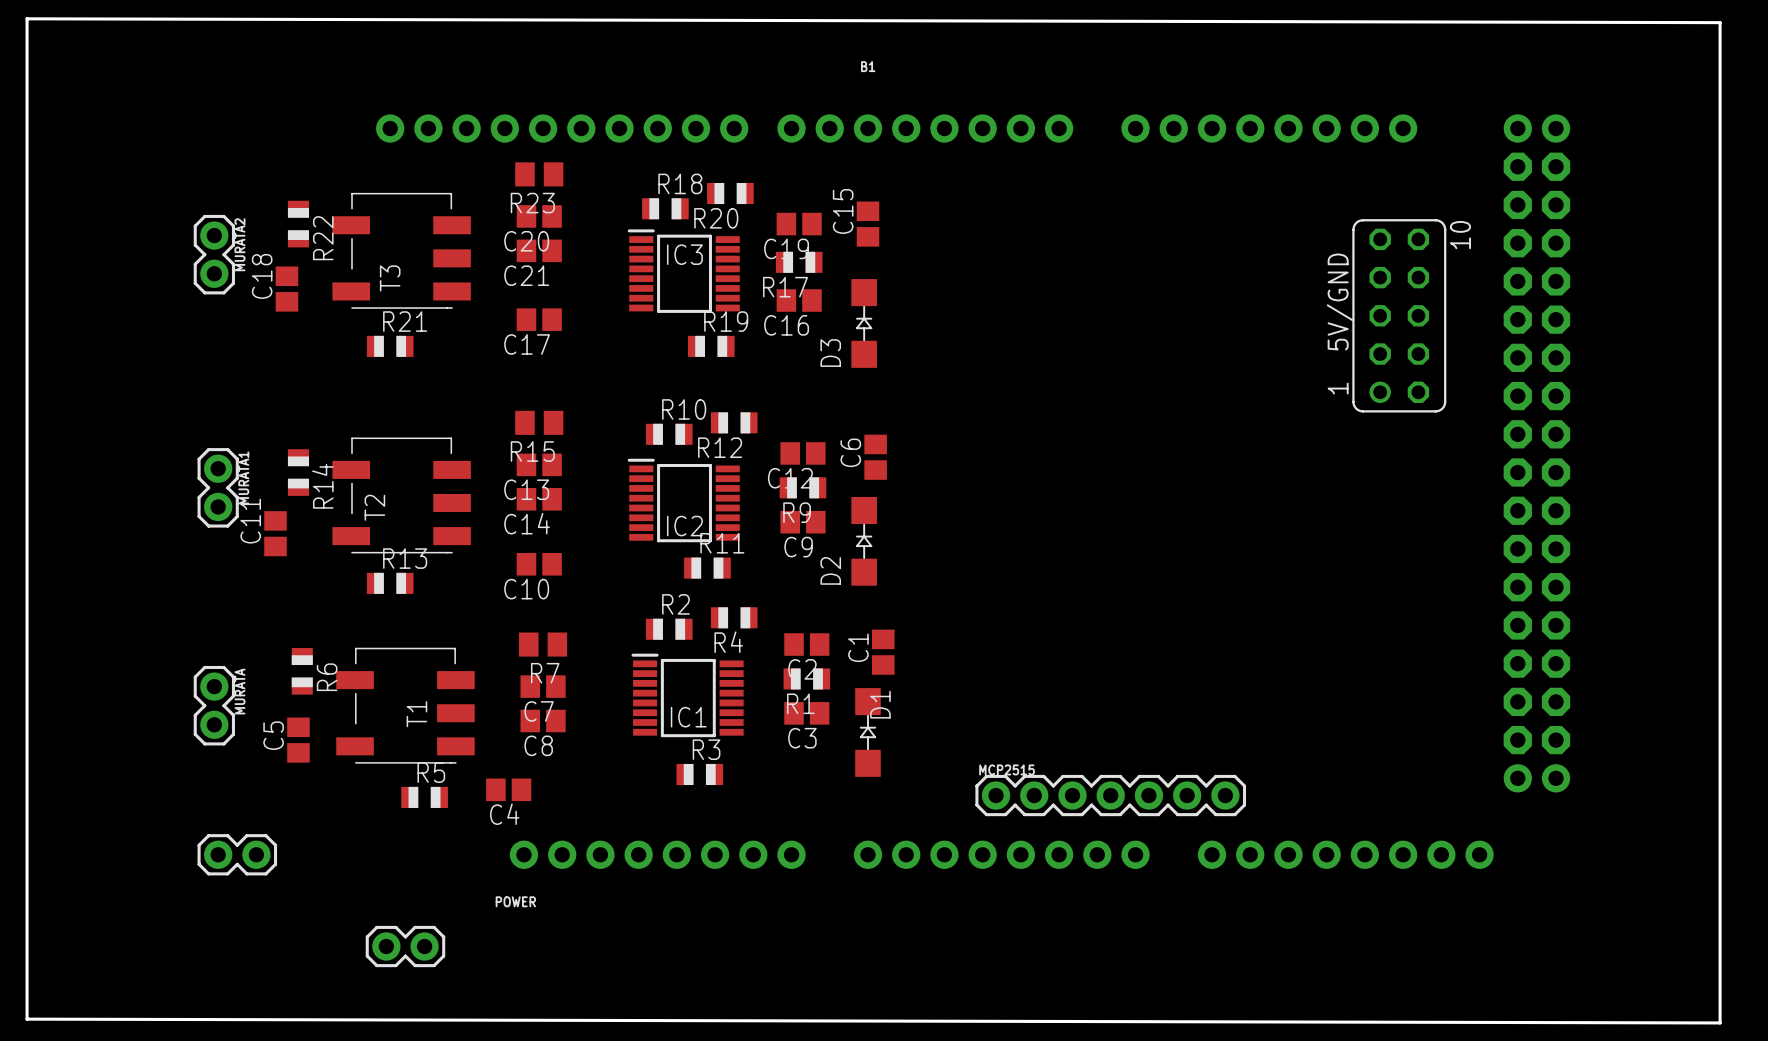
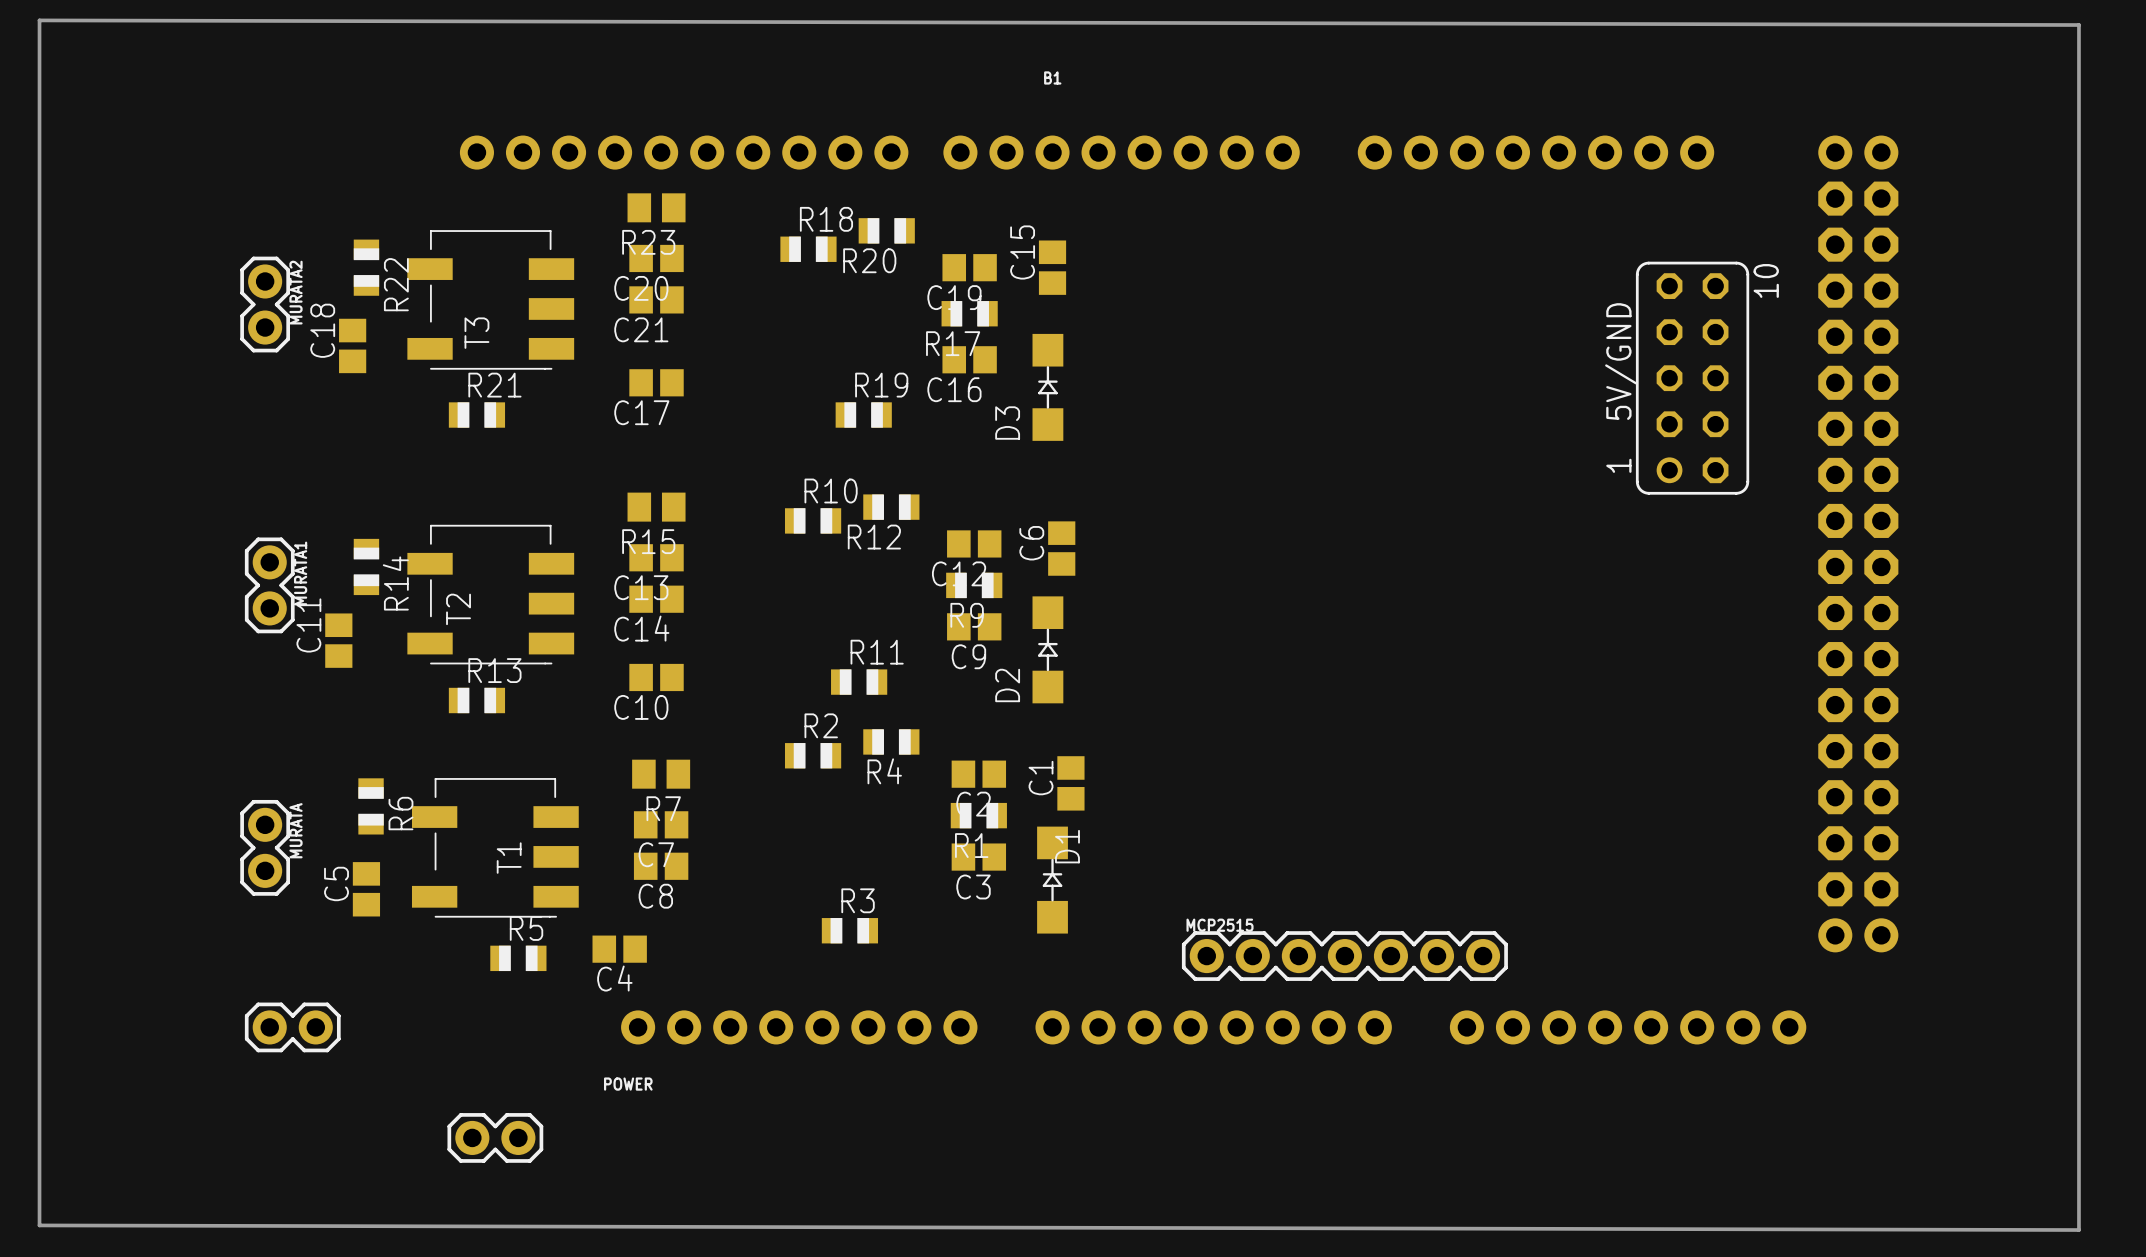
IC3: (683, 271) -> none
IC2: (683, 500) -> none
IC1: (687, 695) -> none

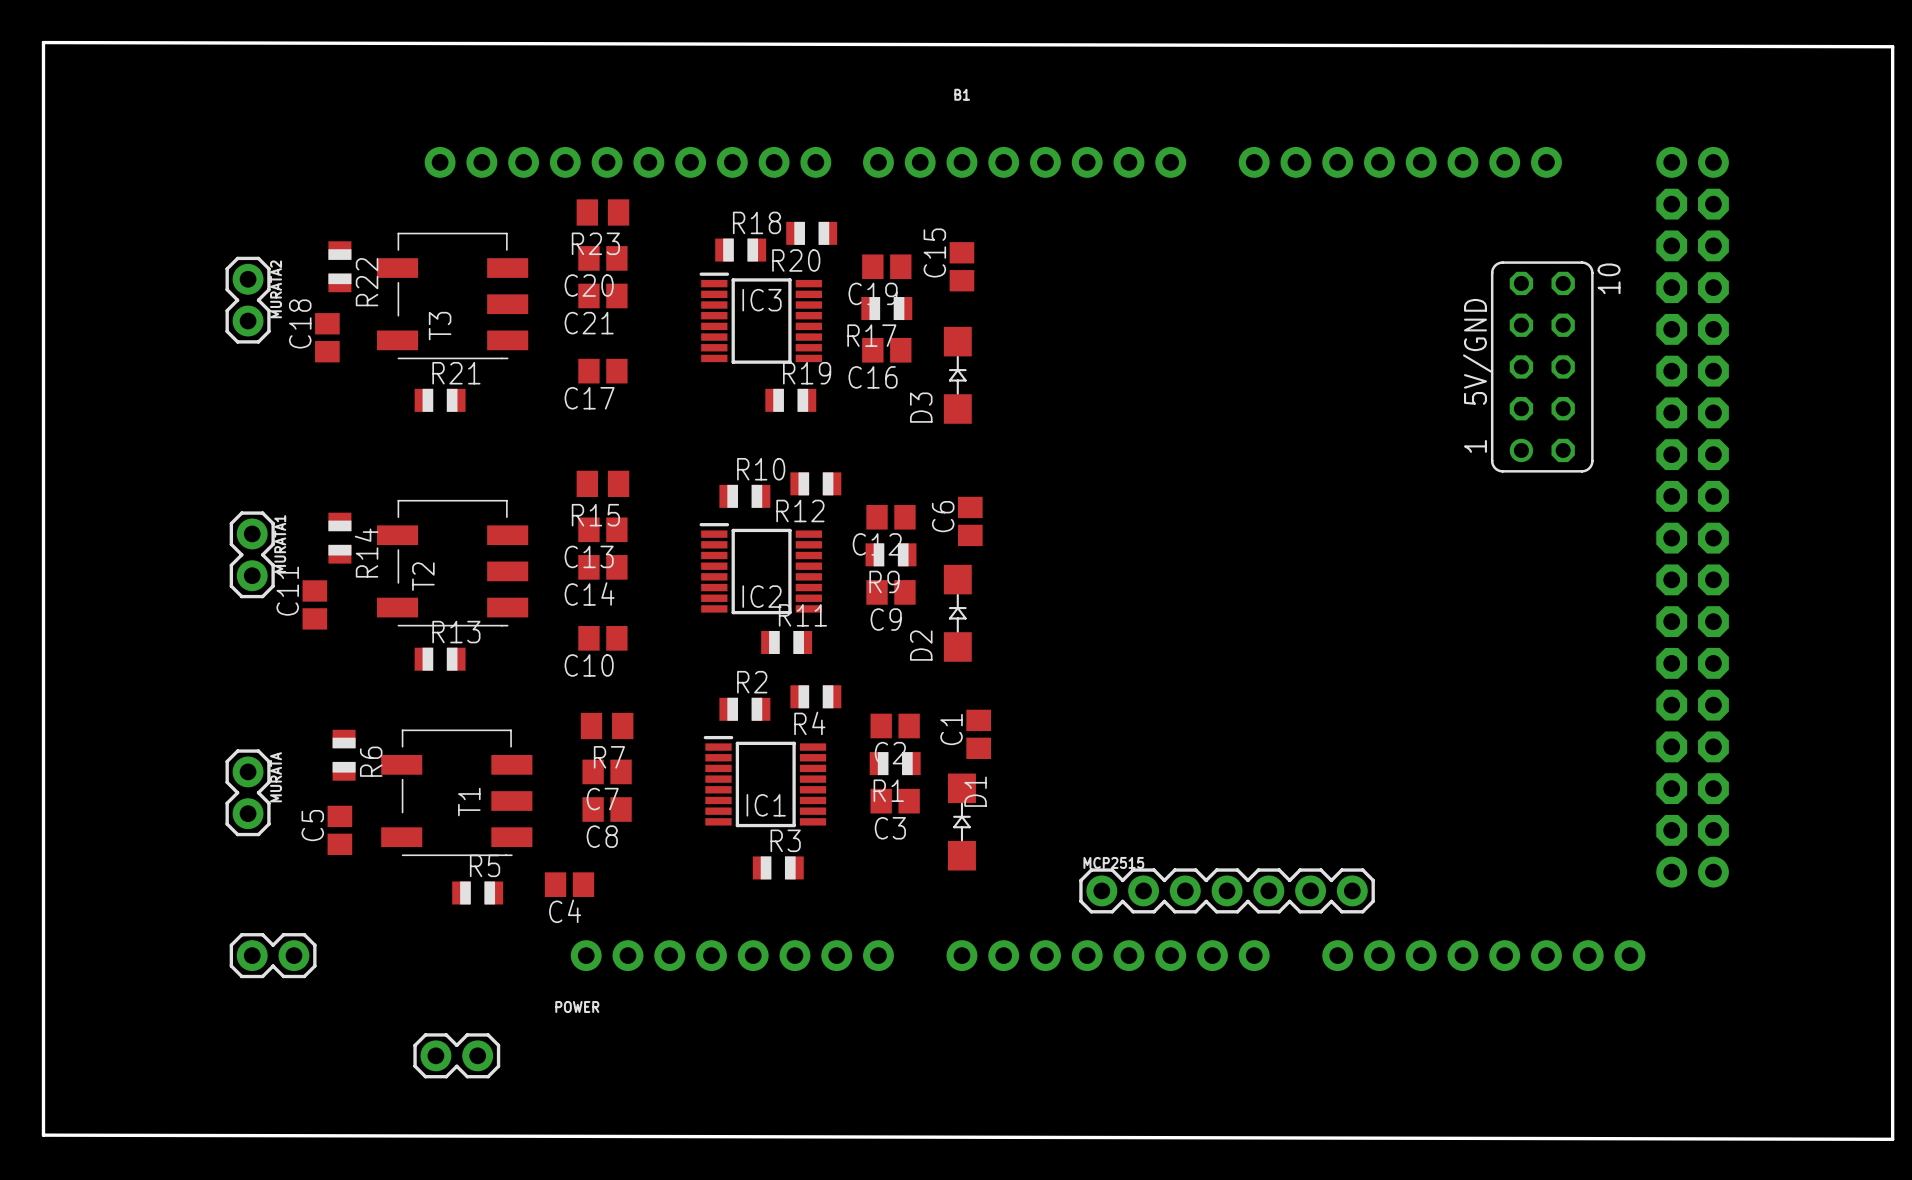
IC3: none -> (760, 318)
IC2: none -> (760, 568)
IC1: none -> (764, 781)

